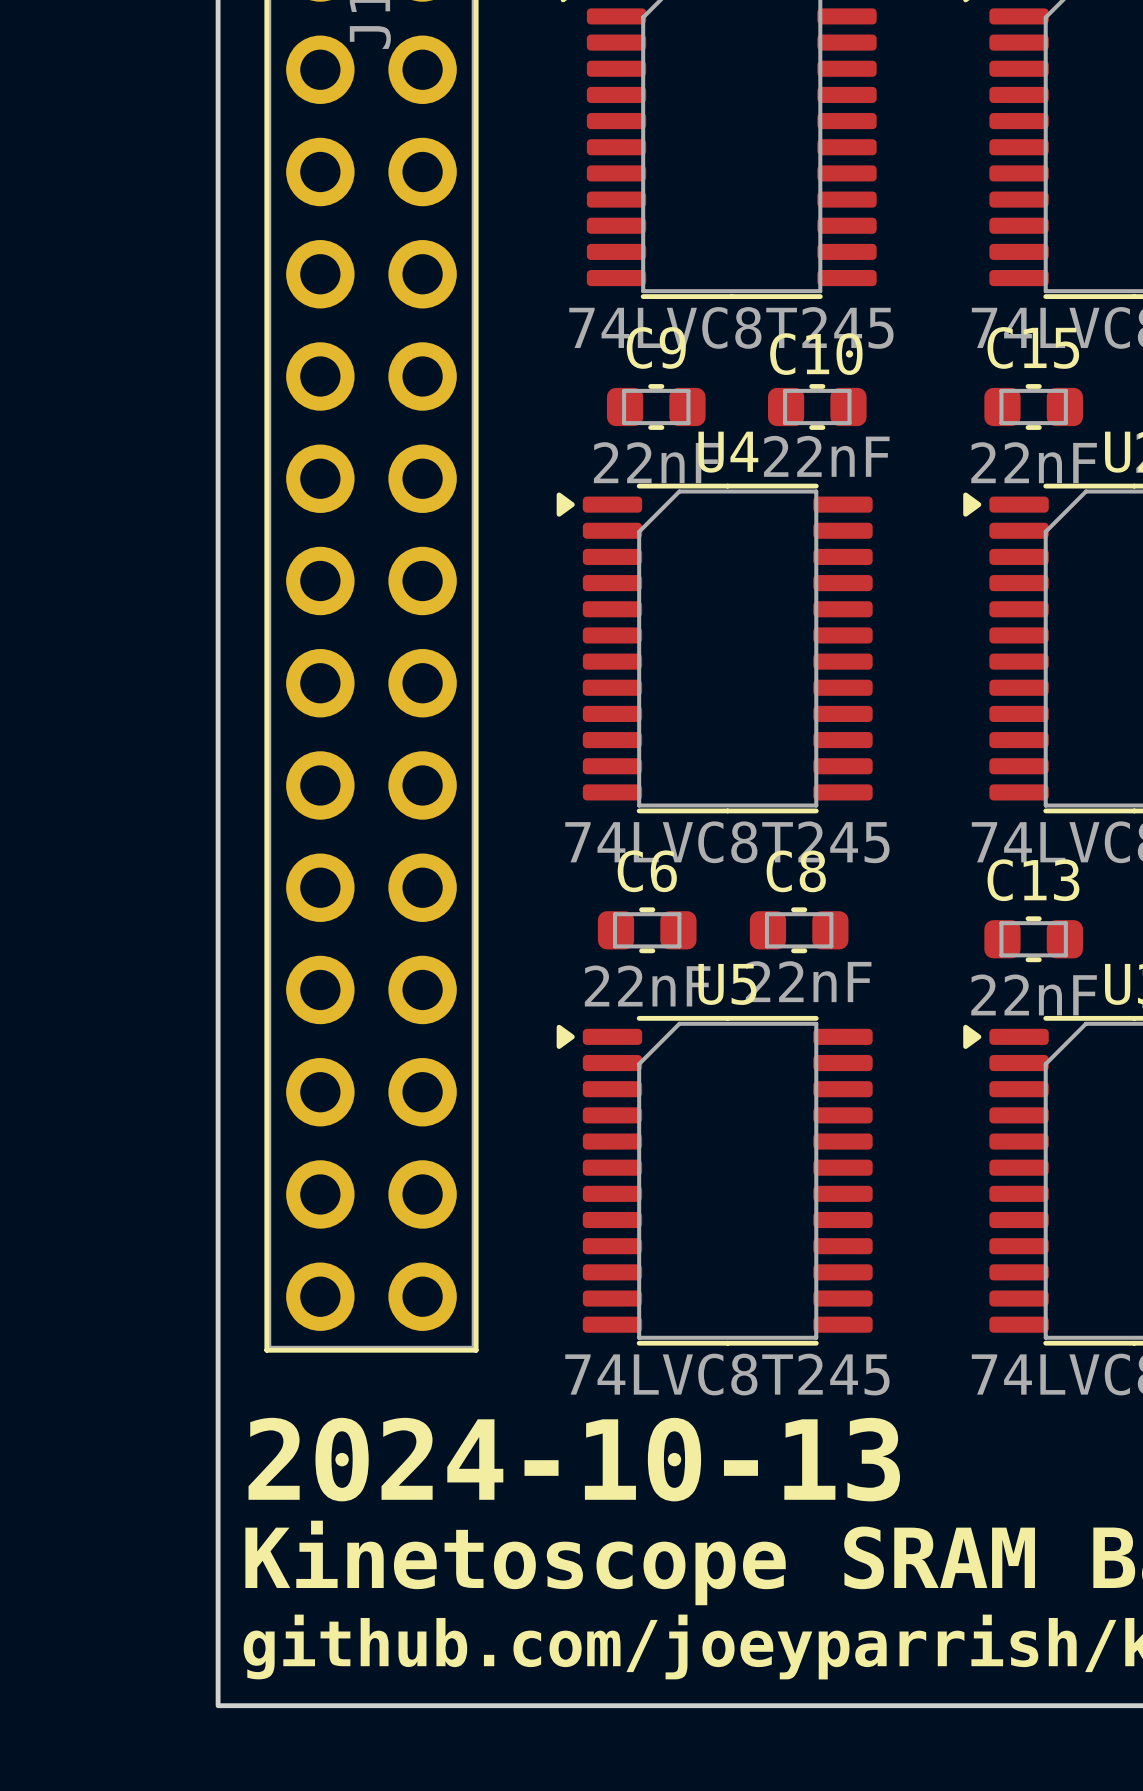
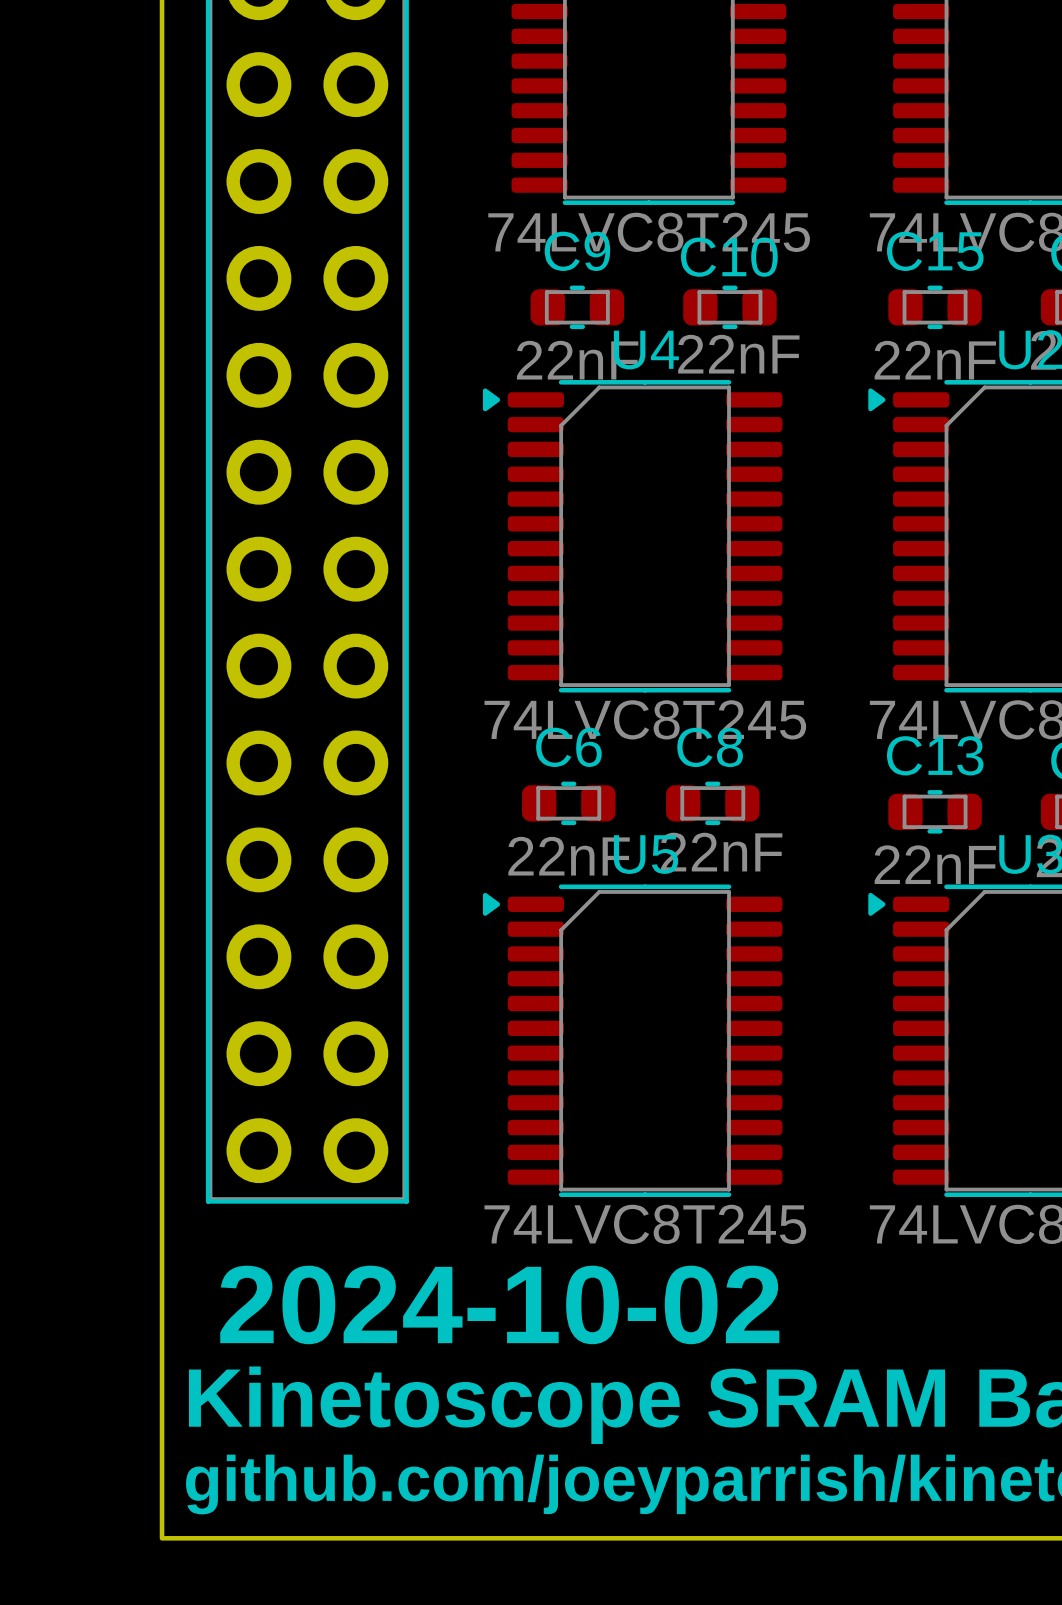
text: 2024-10-13 (574, 1459) -> 2024-10-02 (499, 1304)

